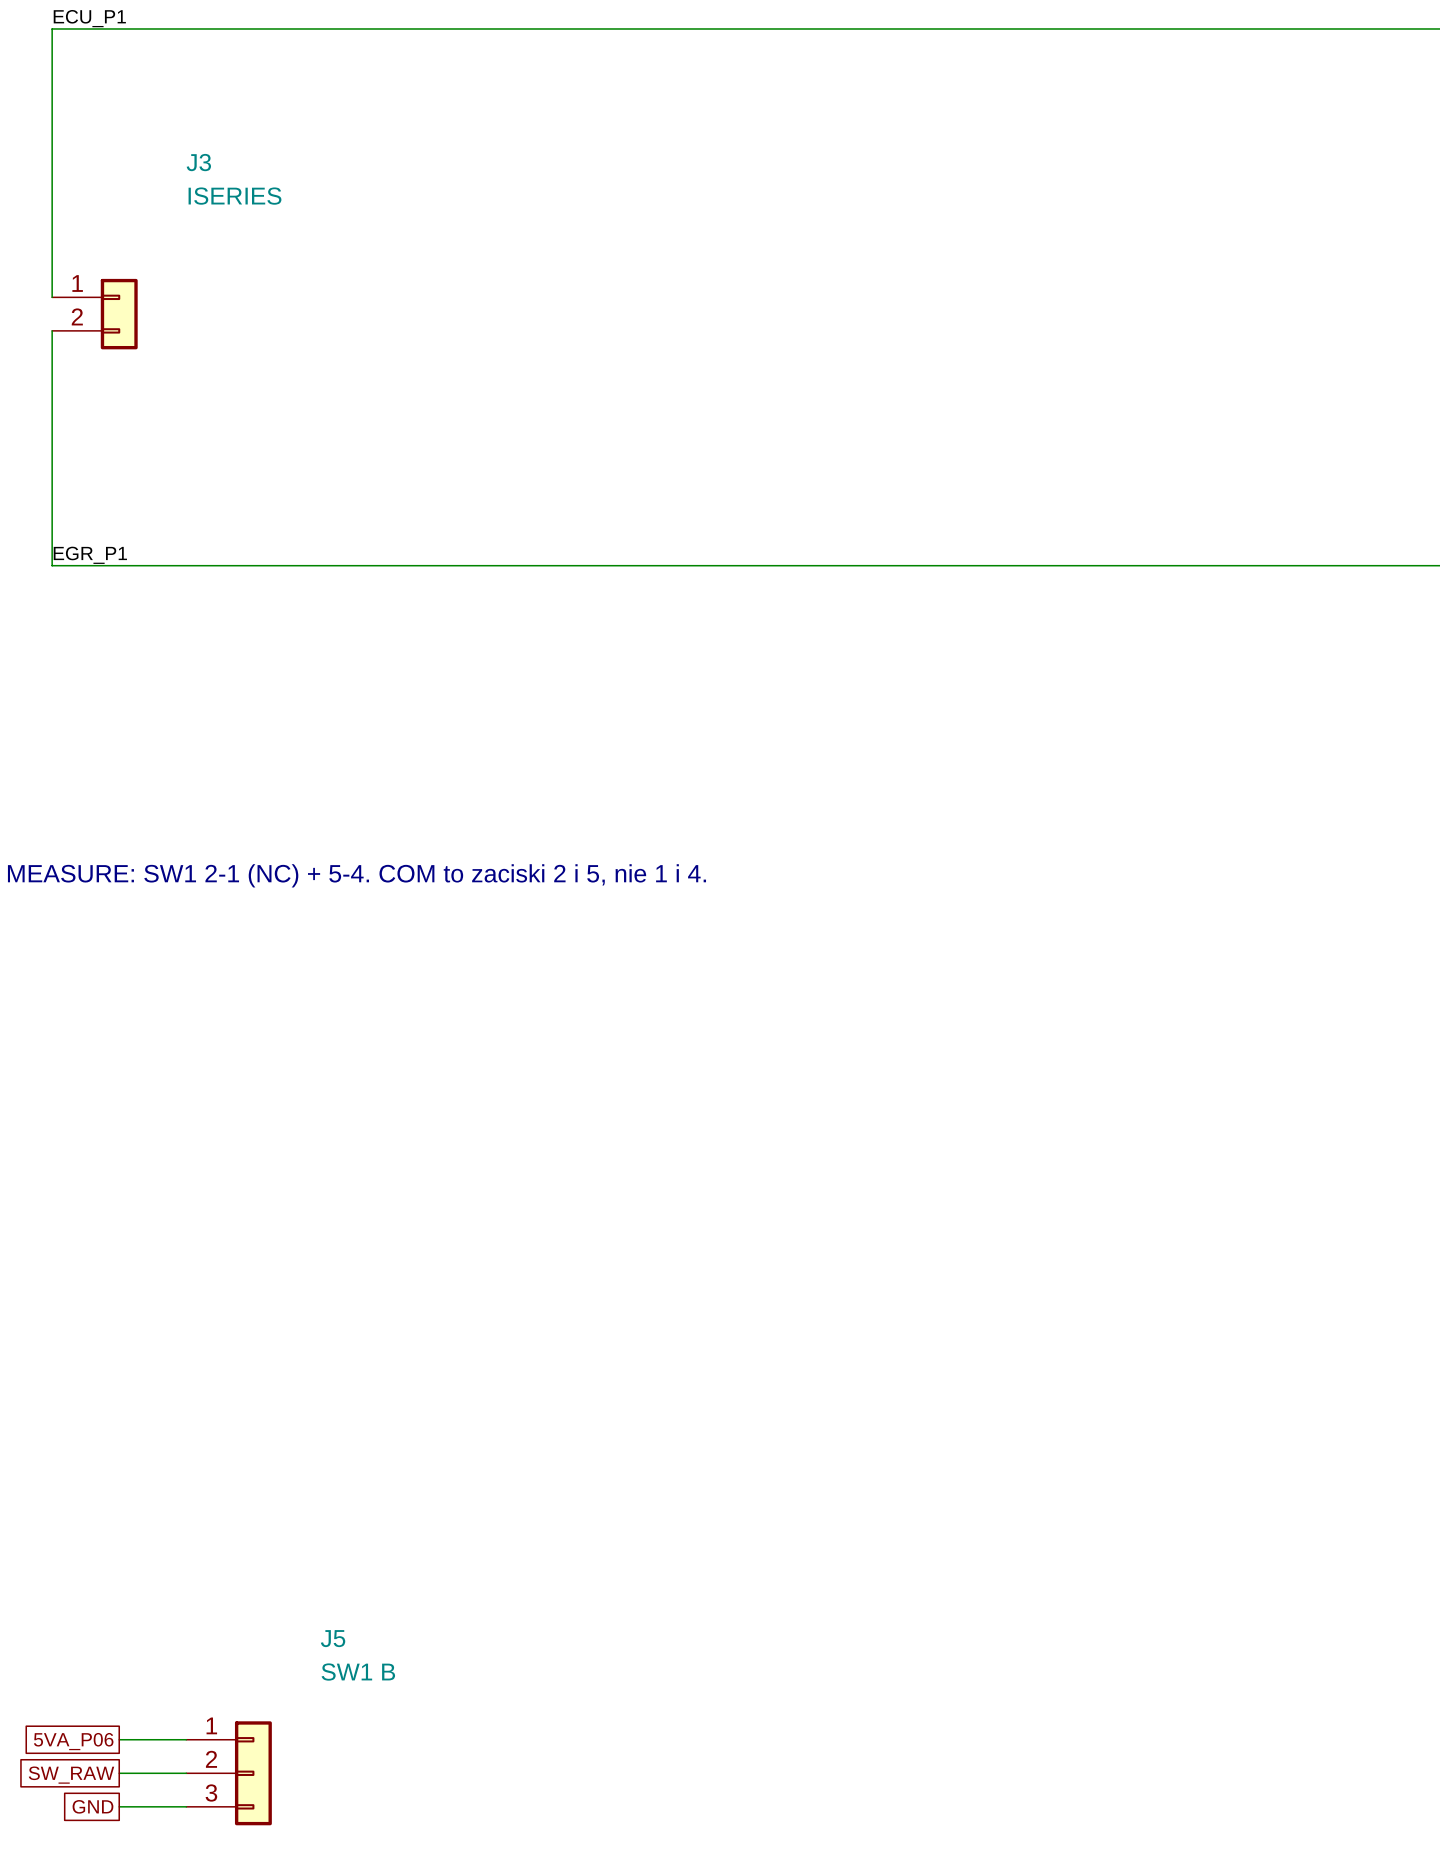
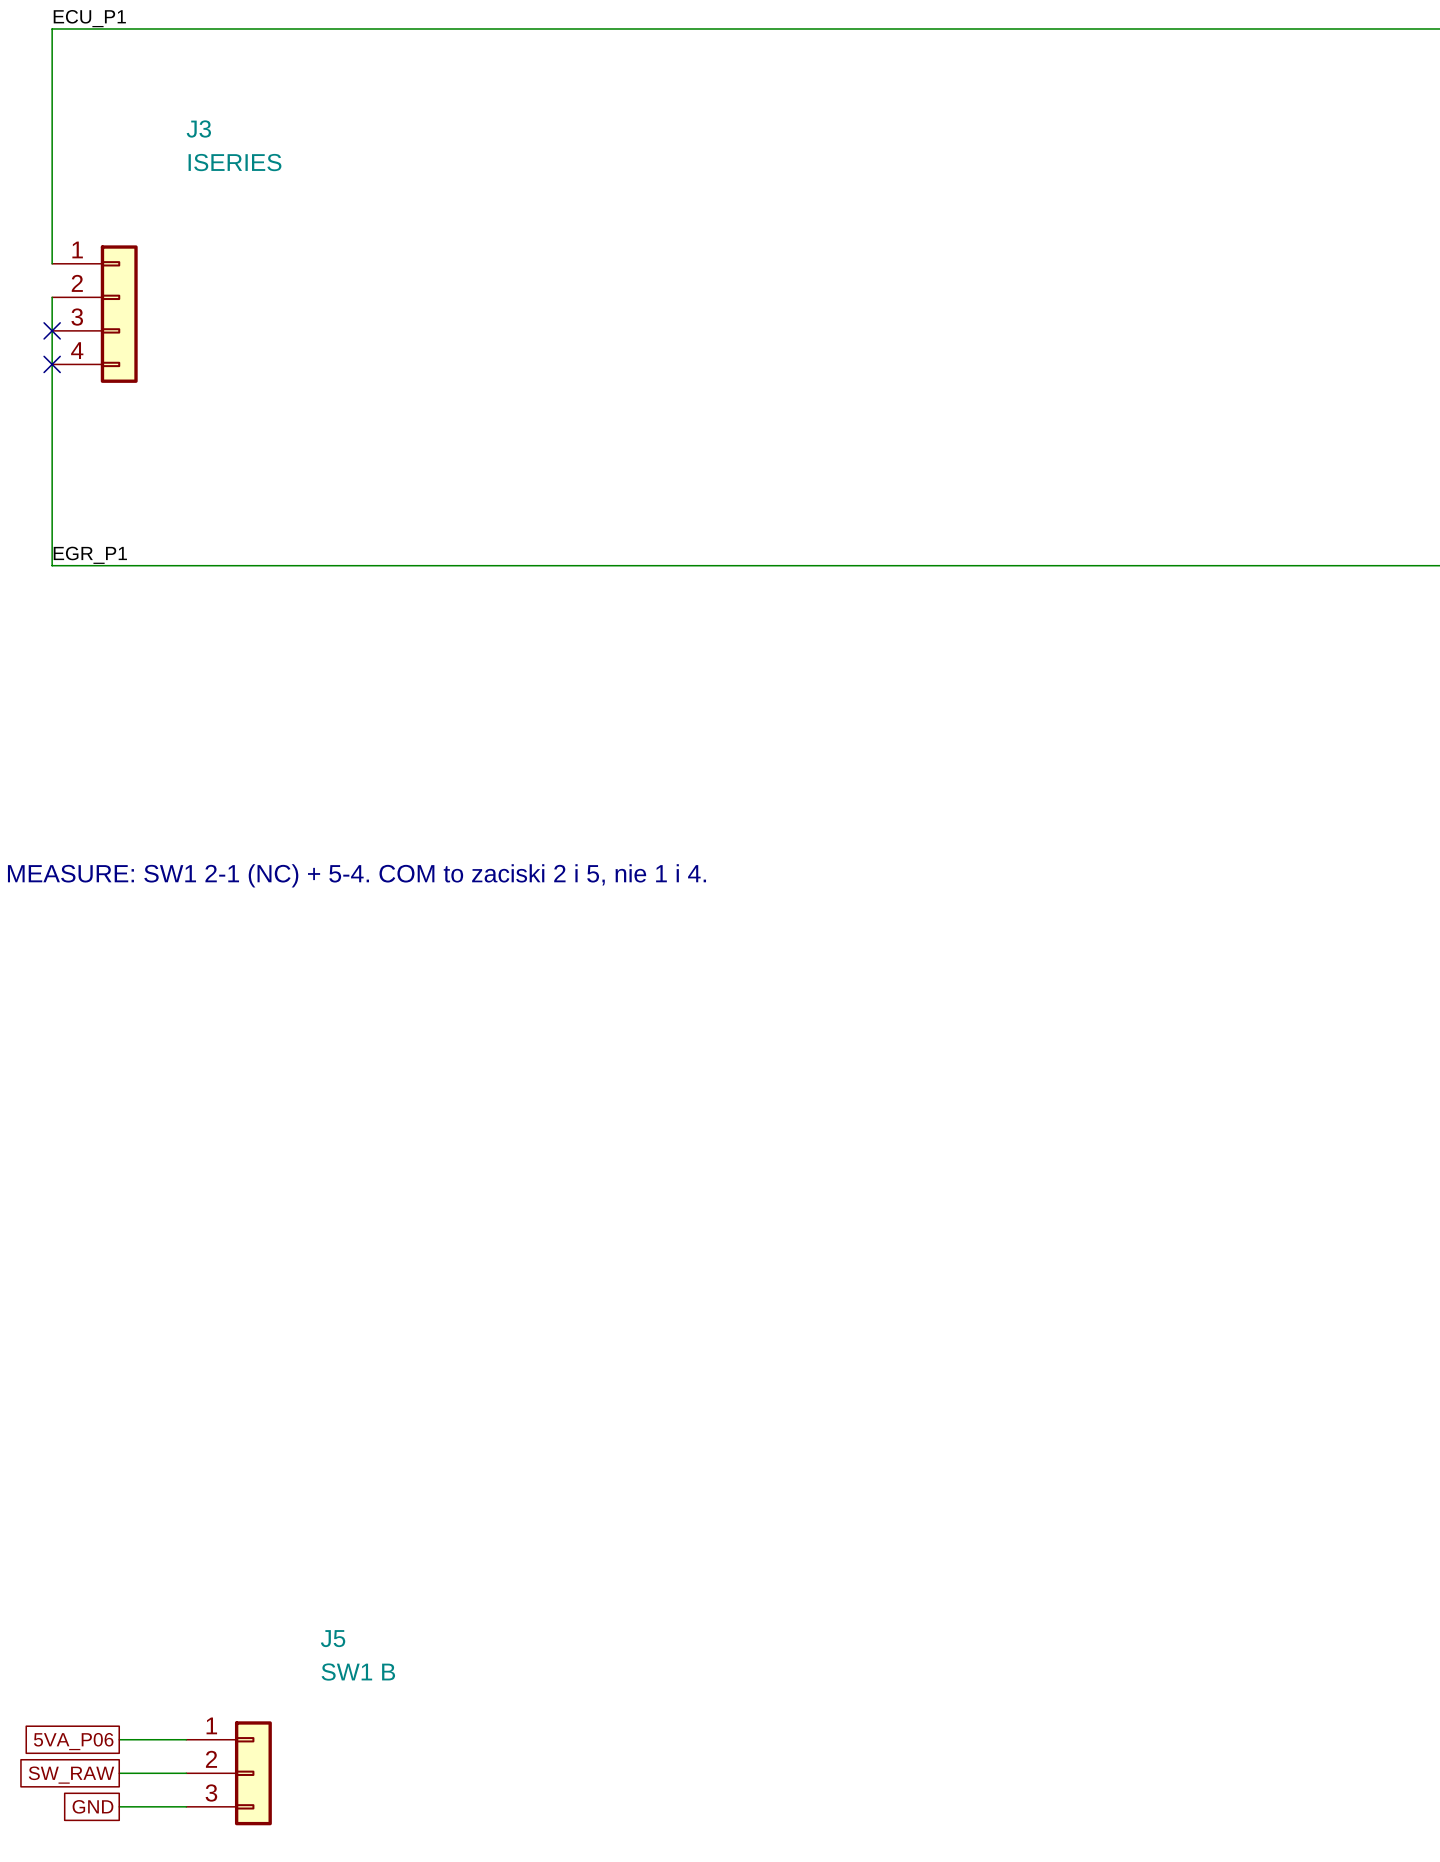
J3 name position: J3 (198, 162) -> J3 (198, 128)
J3 value position: ISERIES (234, 196) -> ISERIES (234, 162)
wire: (52, 263) (52, 297) -> (52, 330) (52, 297)
J3 symbol: [52, 278, 138, 350] -> [52, 245, 138, 383]
no-connect mark: none -> (52, 330)
no-connect mark: none -> (52, 364)

